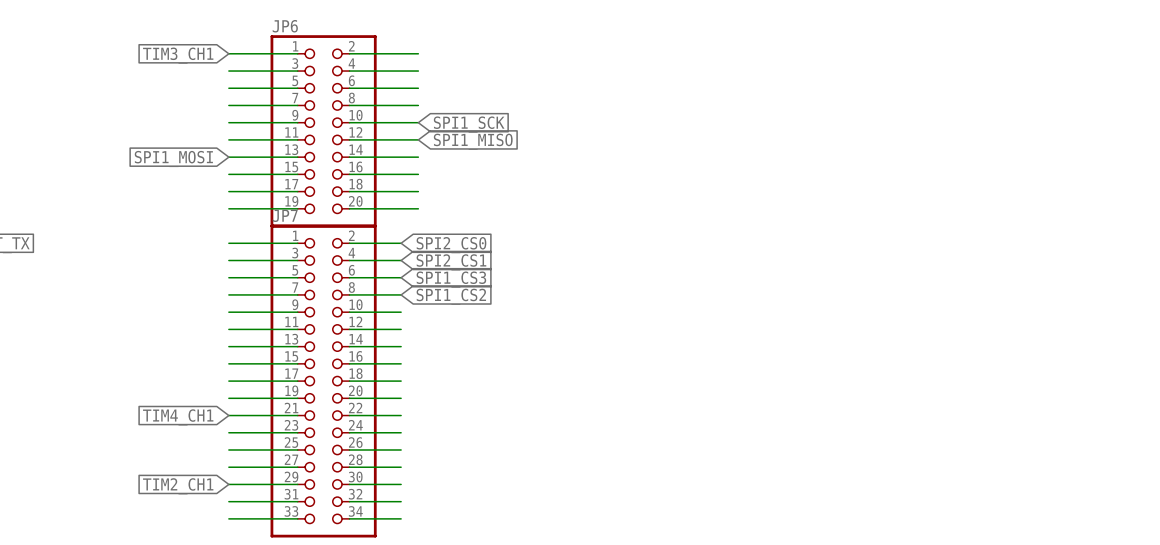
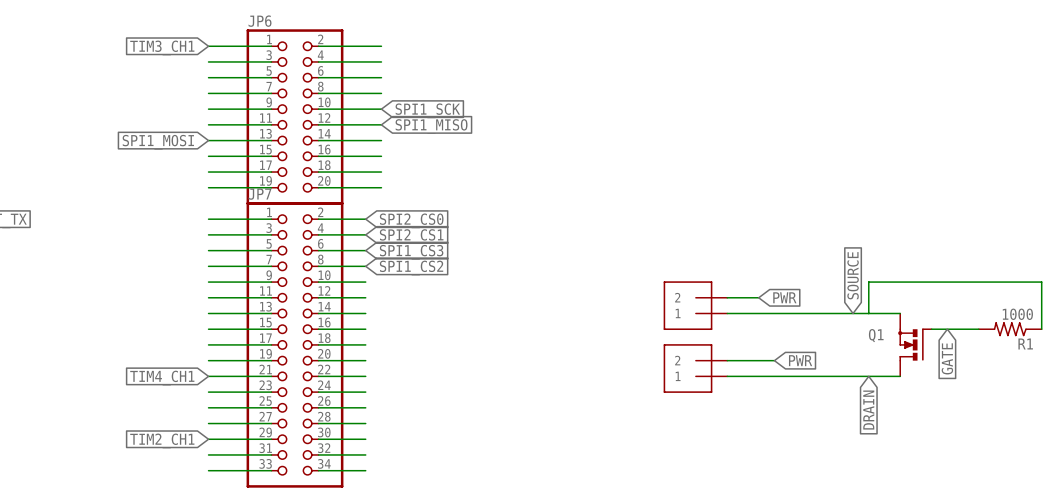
global label: none -> SOURCE (853, 275)
wire: none -> (727, 297) (758, 297)
global label: none -> PWR (784, 297)
part: none -> (695, 305)
wire: none -> (727, 313) (900, 313)
wire: none -> (868, 313) (868, 282) (1041, 282) (1041, 329)
wire: none -> (931, 329) (978, 329)
R1: none -> 1000 (1010, 329)
Q1: none -> (915, 344)
global label: none -> GATE (947, 358)
wire: none -> (727, 360) (774, 360)
global label: none -> PWR (800, 360)
part: none -> (695, 368)
wire: none -> (727, 376) (900, 376)
global label: none -> DRAIN (868, 410)

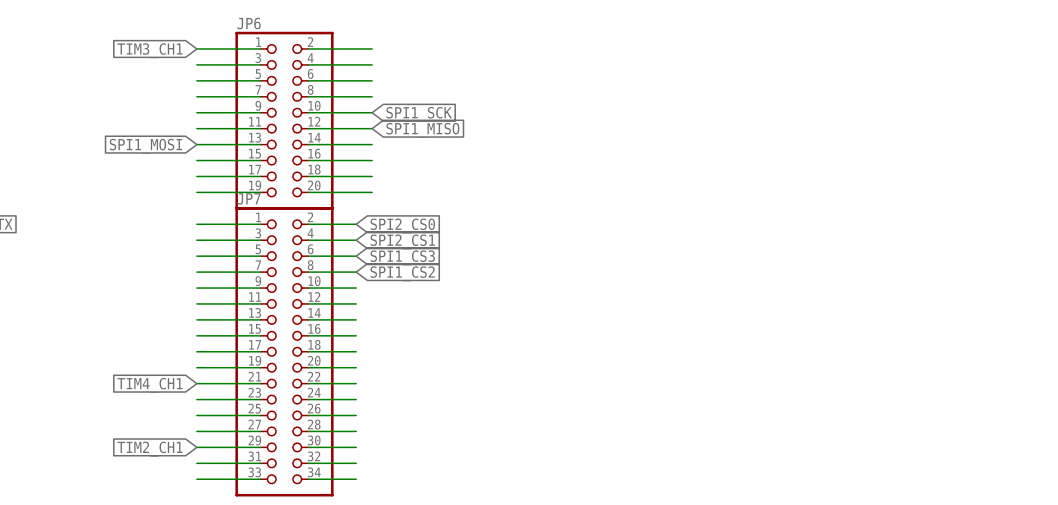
global label: SOURCE (853, 275) -> none
wire: (727, 297) (758, 297) -> none
global label: PWR (784, 297) -> none
part: (695, 305) -> none
wire: (727, 313) (900, 313) -> none
wire: (868, 313) (868, 282) (1041, 282) (1041, 329) -> none
wire: (931, 329) (978, 329) -> none
R1: 1000 (1010, 329) -> none
Q1: (915, 344) -> none
global label: GATE (947, 358) -> none
wire: (727, 360) (774, 360) -> none
global label: PWR (800, 360) -> none
part: (695, 368) -> none
wire: (727, 376) (900, 376) -> none
global label: DRAIN (868, 410) -> none

